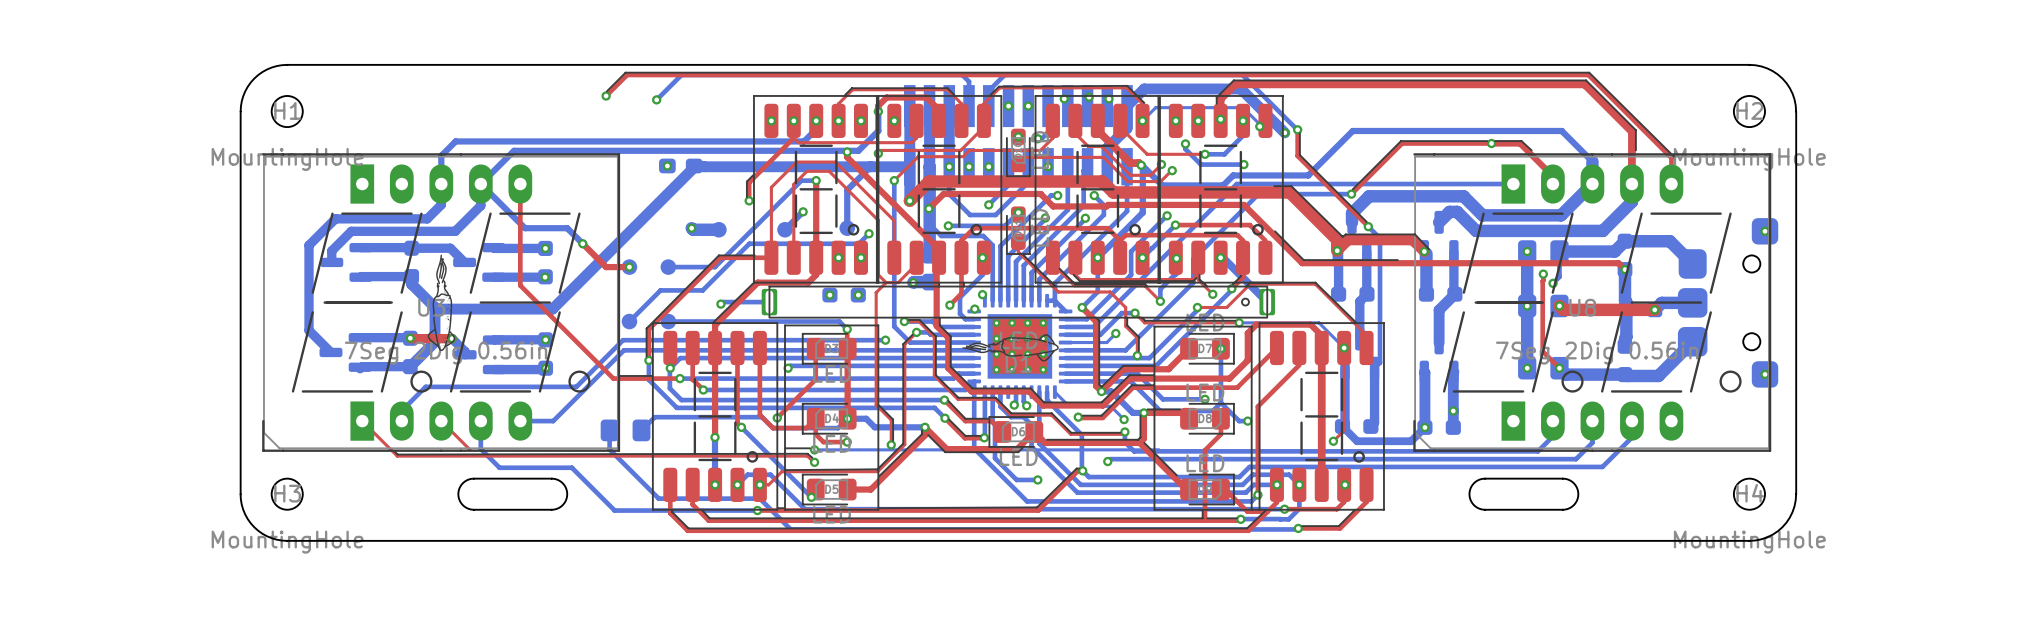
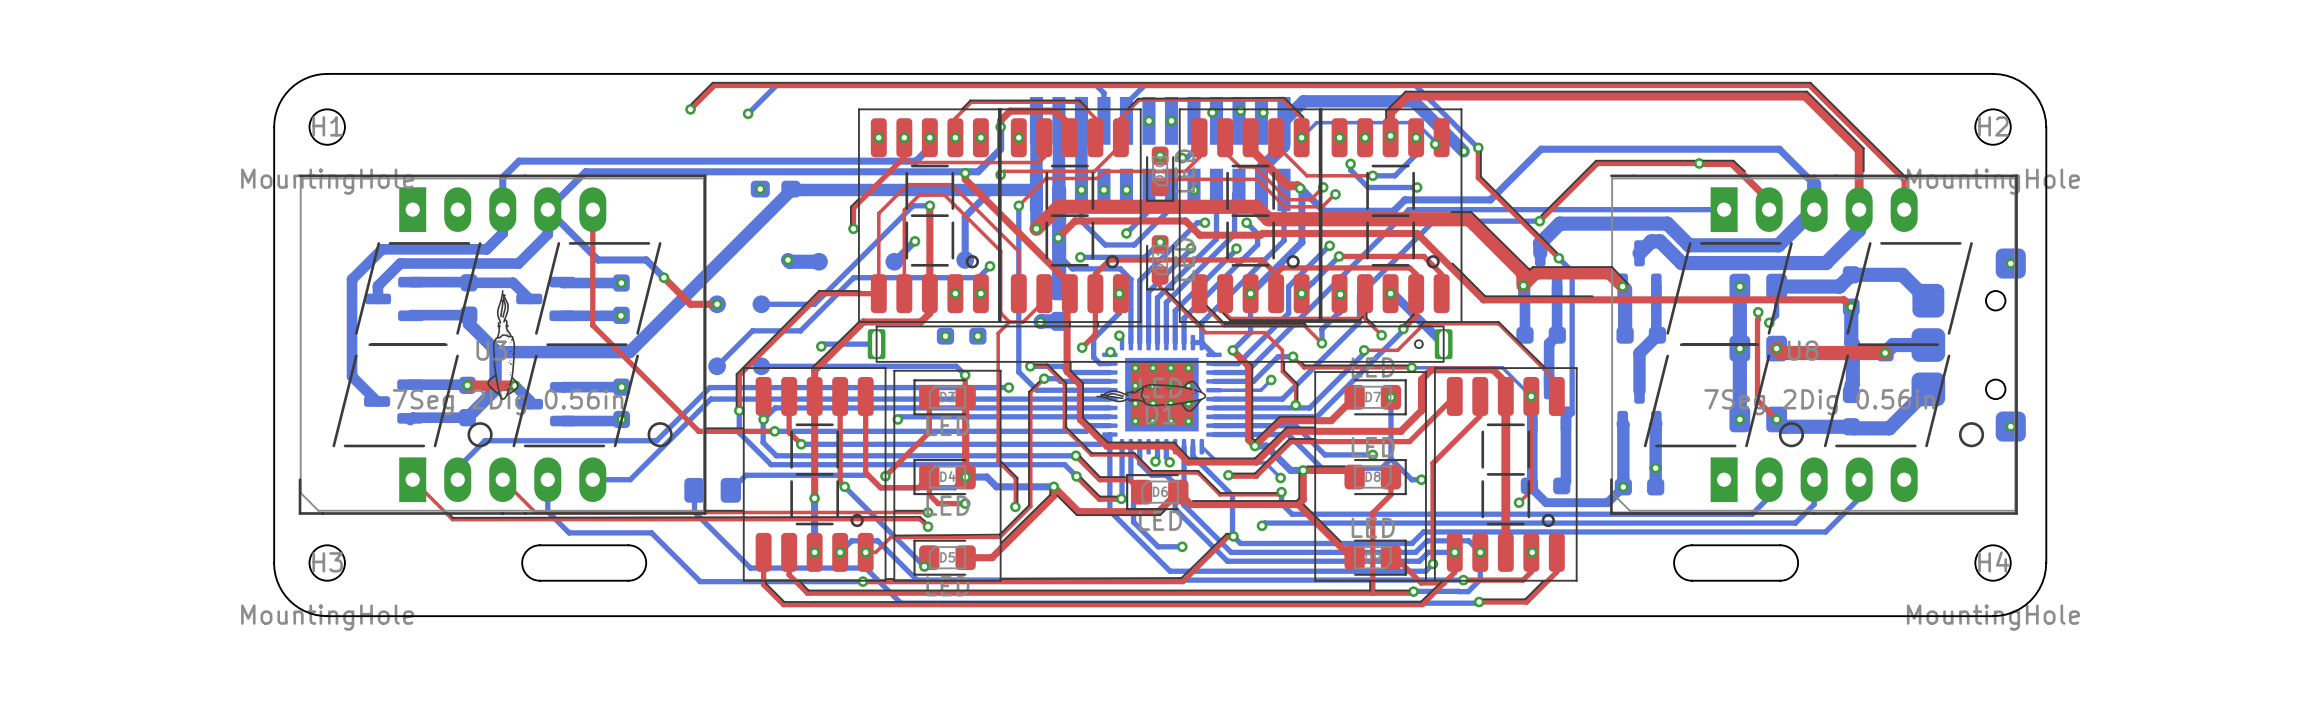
line: none -> (705, 510) (742, 510)
top track: none -> (535, 512) (927, 512)
bottom track: (814, 449) (1159, 449) -> none

